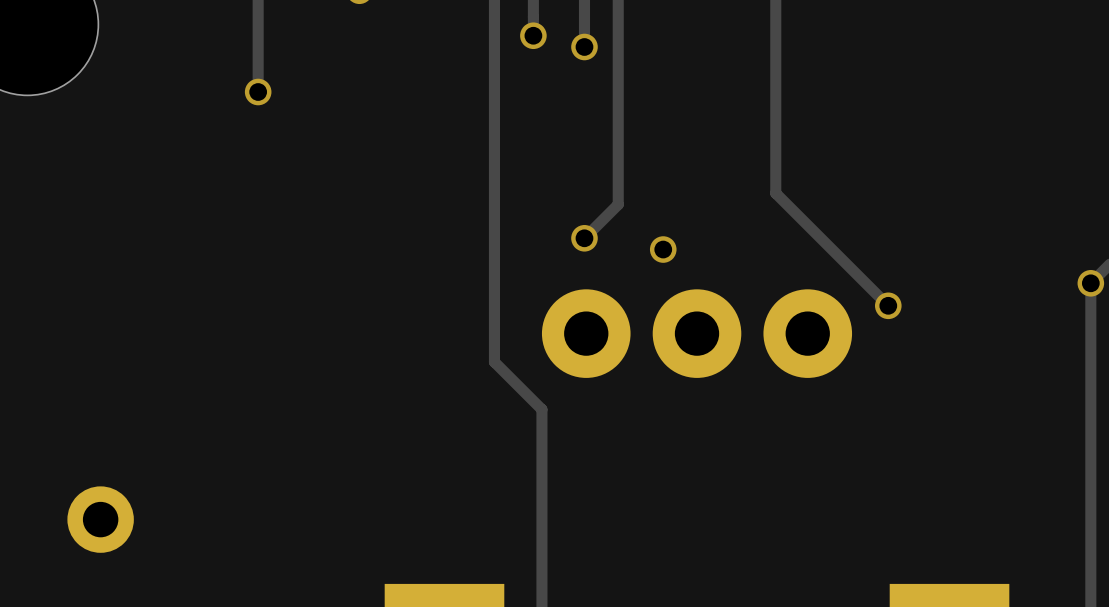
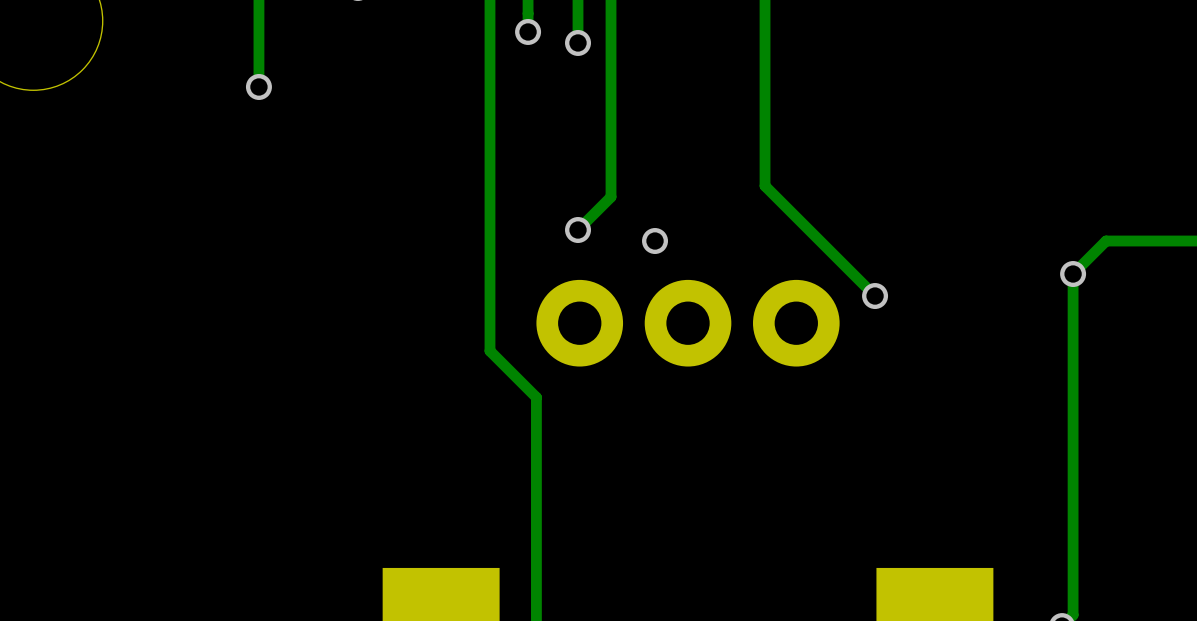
part: (100, 519) -> none

